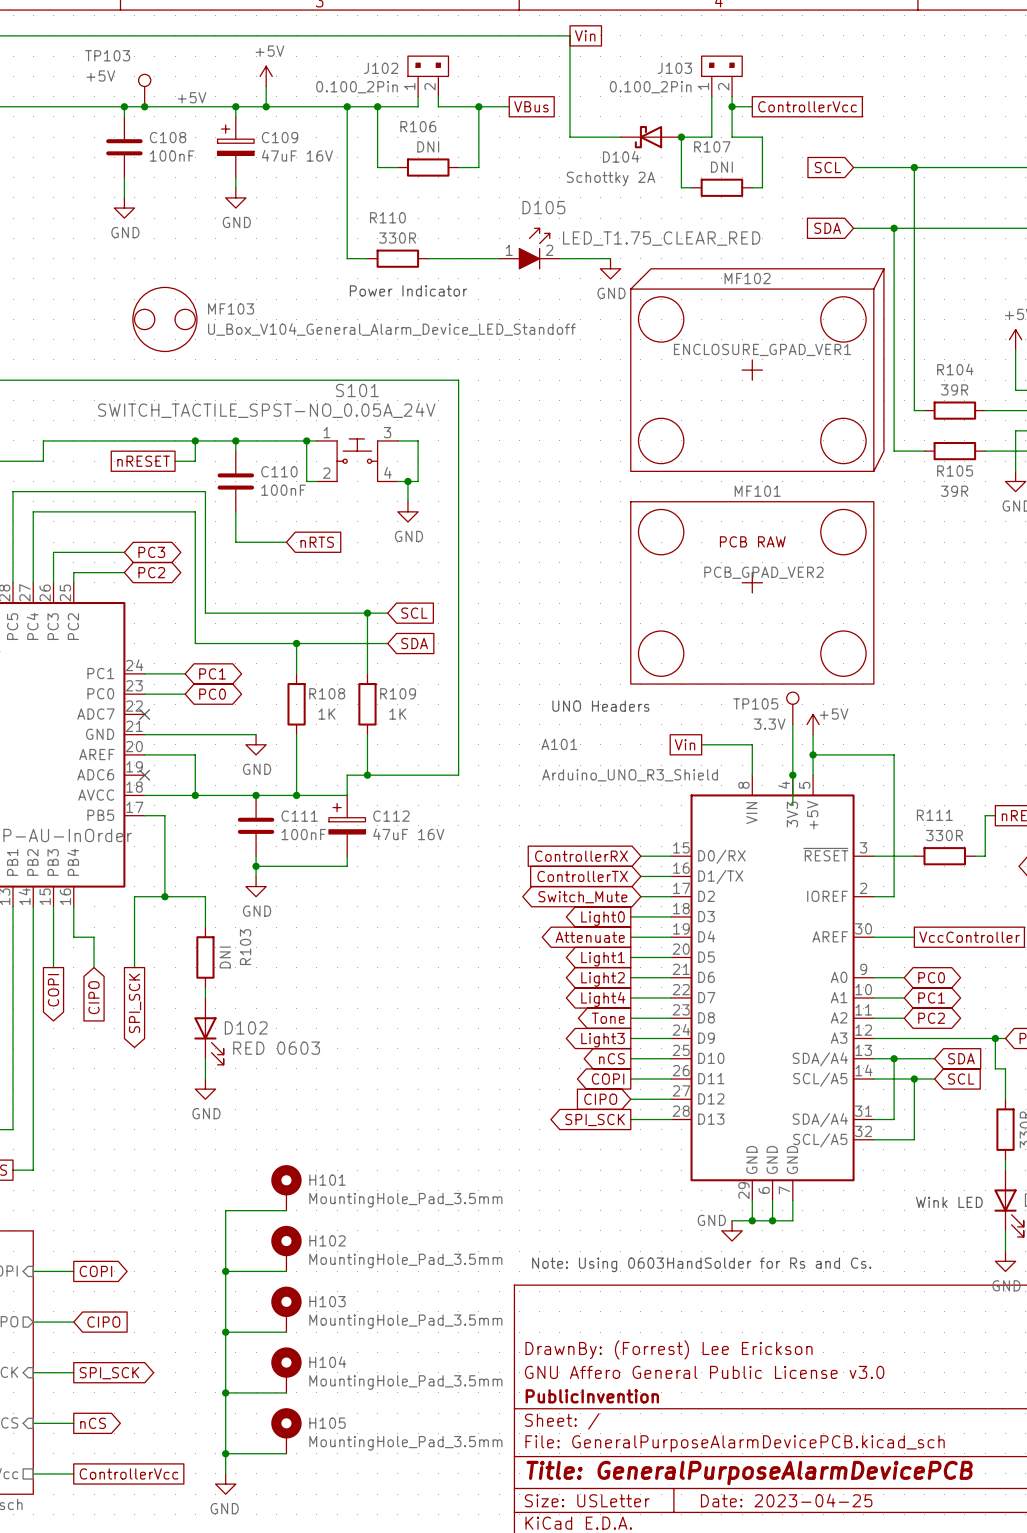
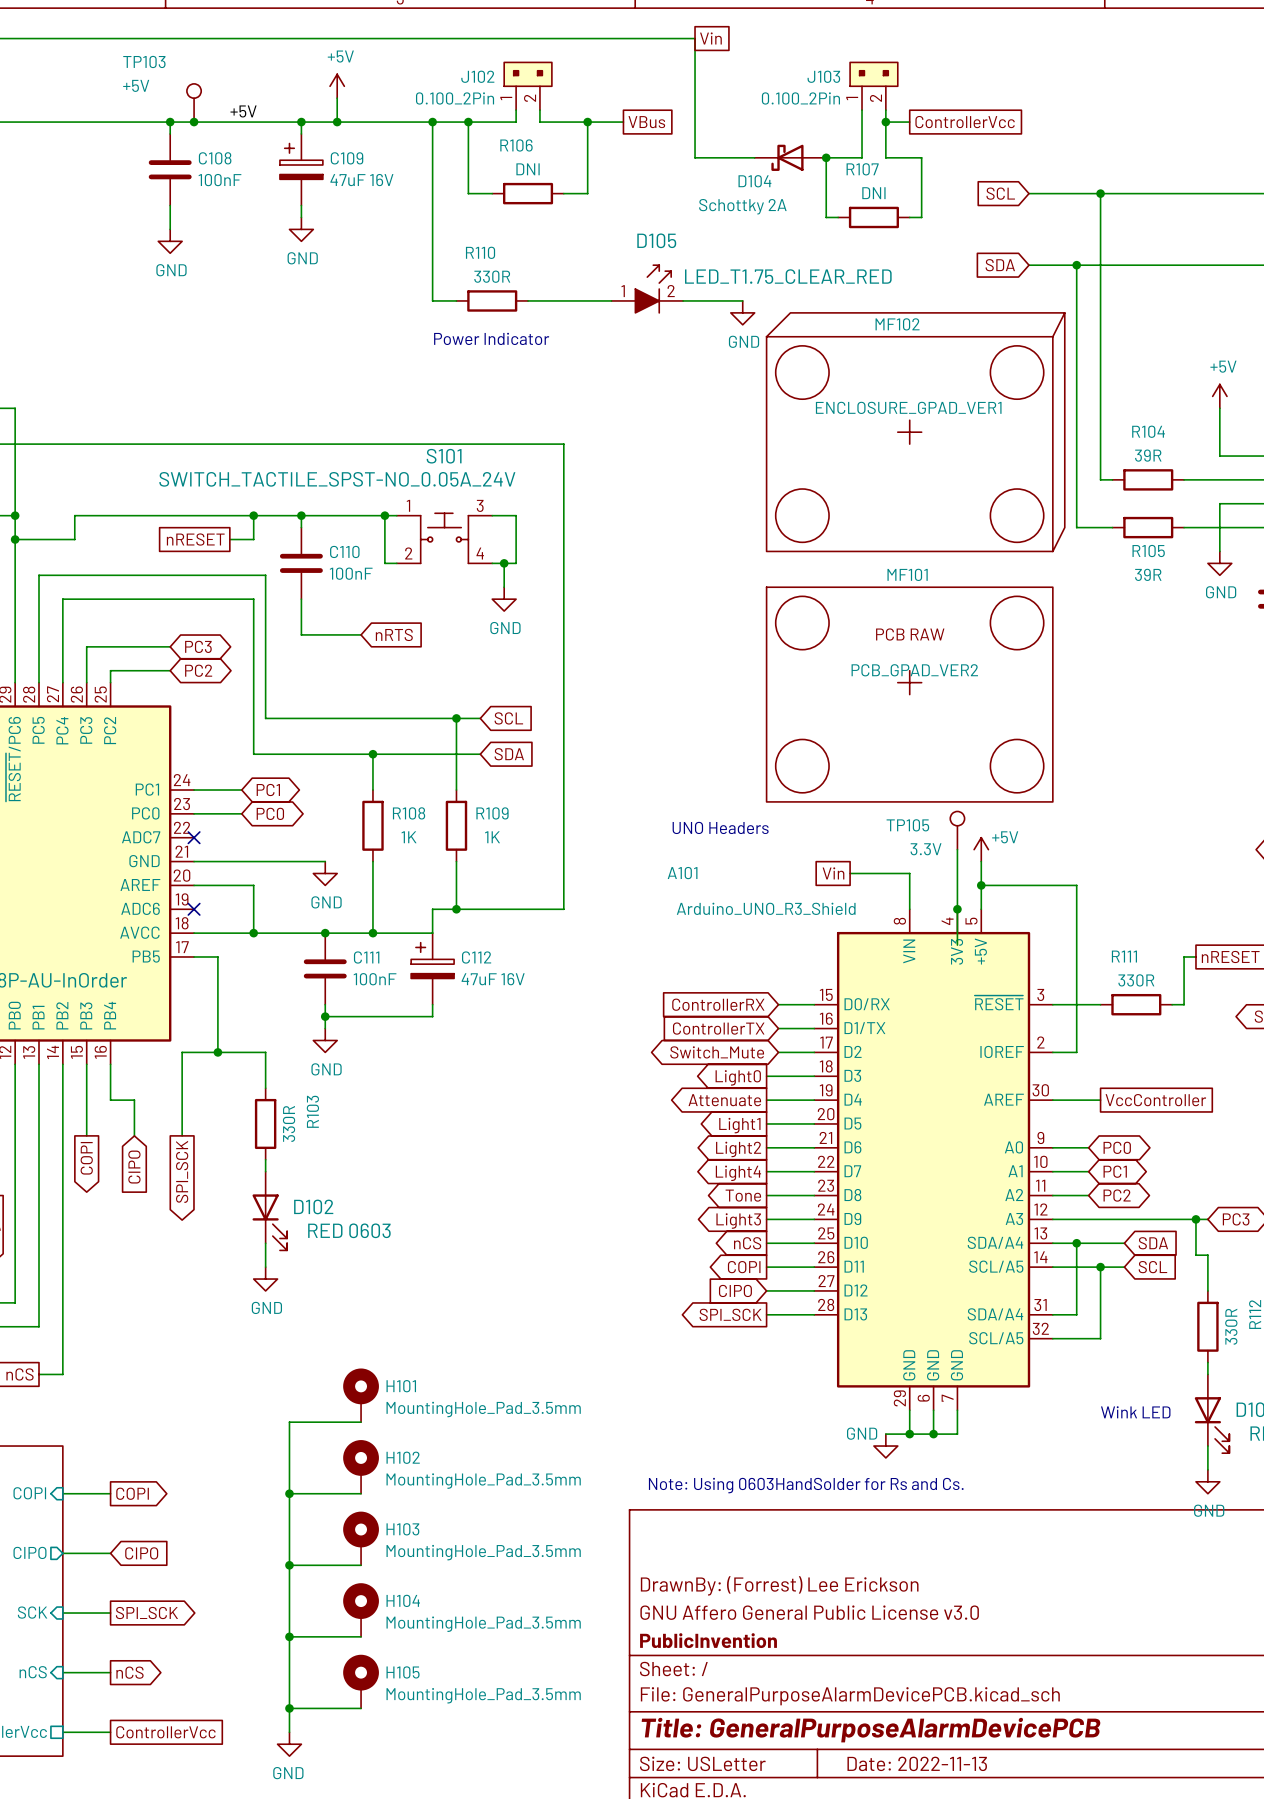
MF103: U_Box_V104_General_Alarm_Device_LED_Standoff (164, 319) -> none
R103 value: DNI (225, 957) -> 330R (289, 1123)
title block: Date: 2023-04-25 (786, 1500) -> Date: 2022-11-13 (917, 1763)

